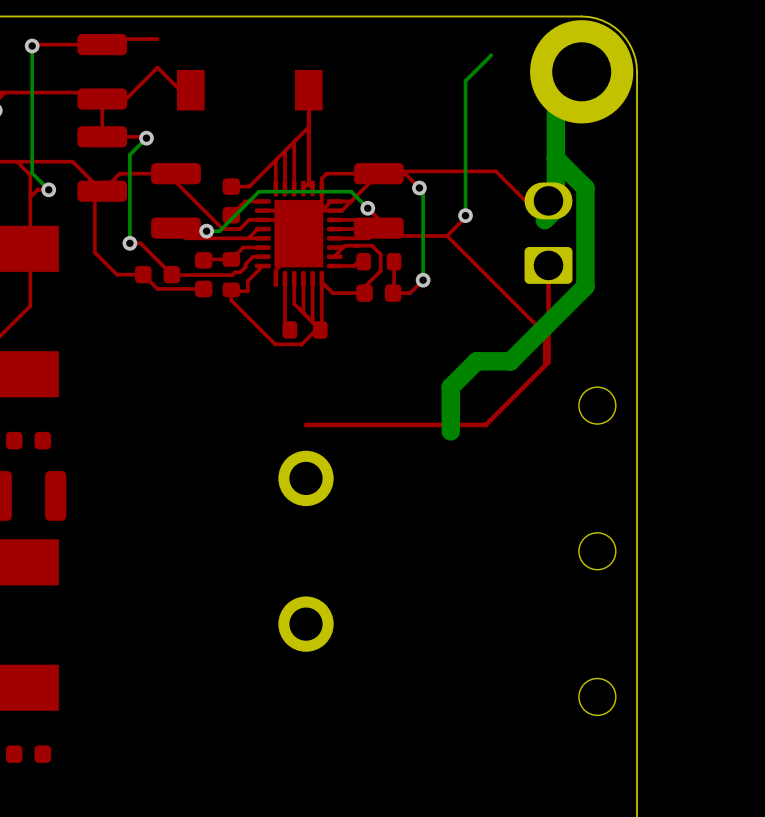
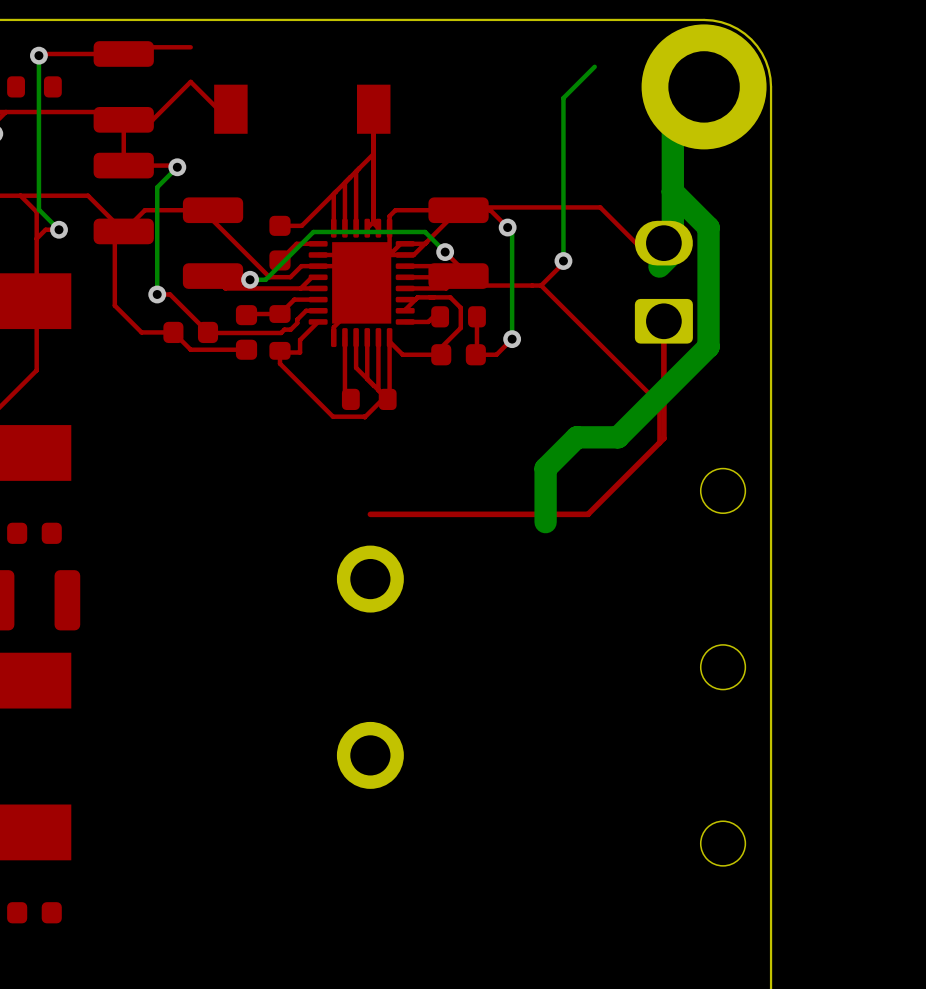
part: none -> (34, 86)

